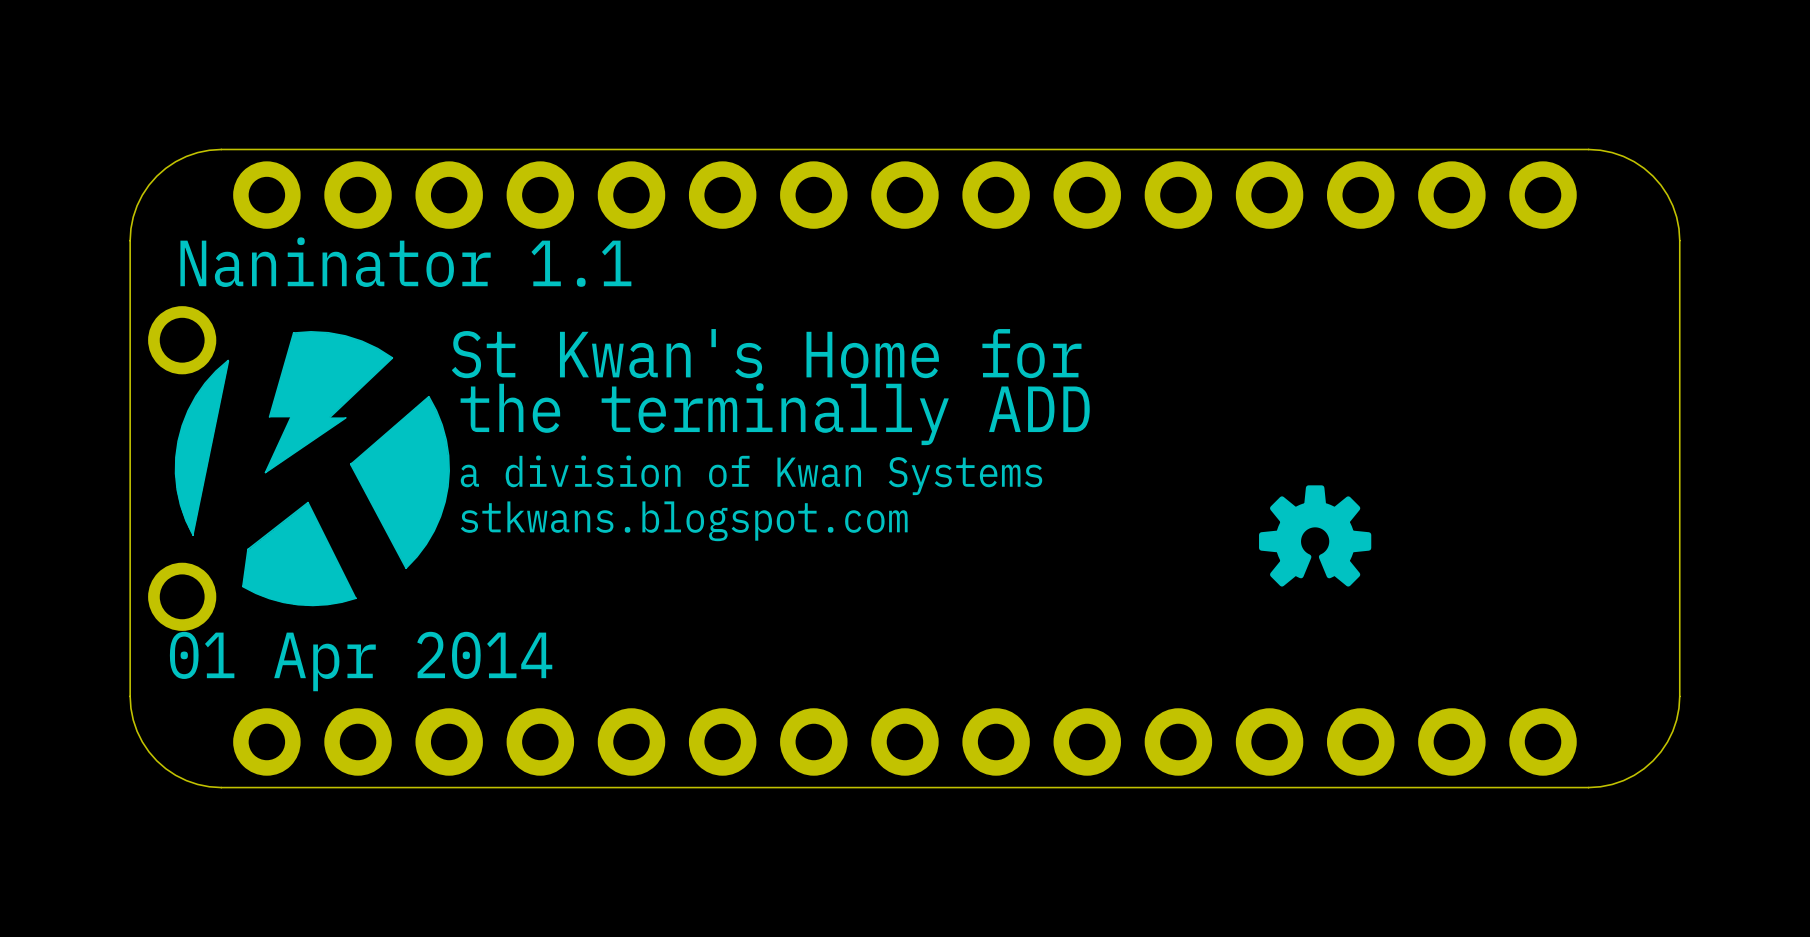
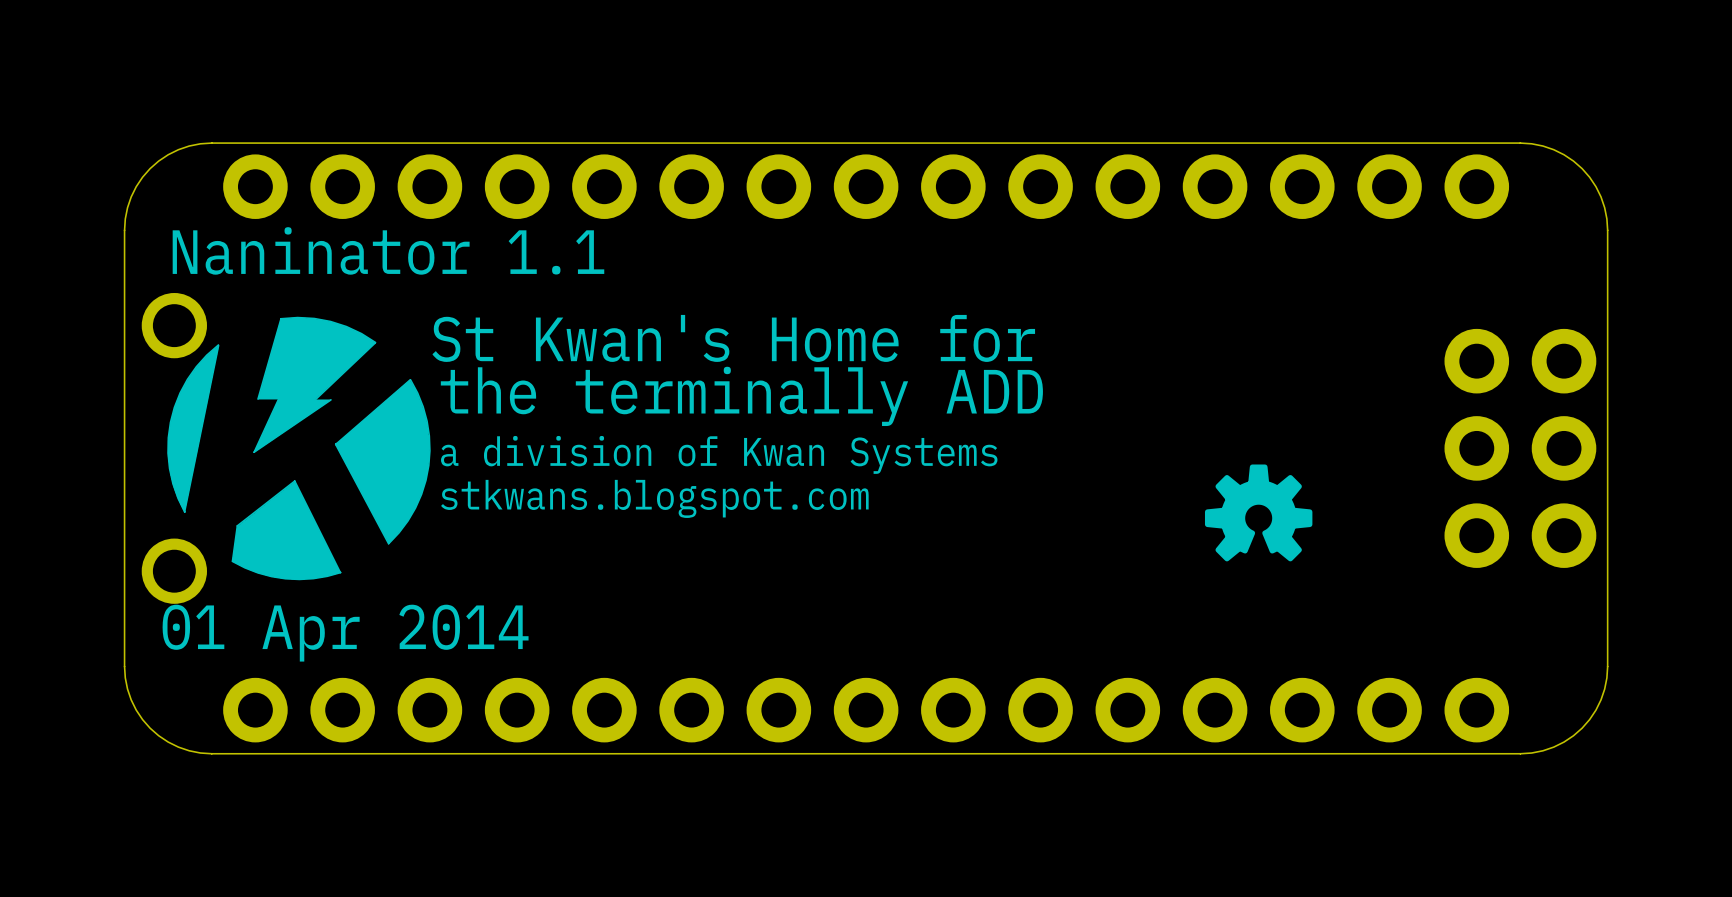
part: none -> (1476, 448)
part: none -> (1564, 448)

